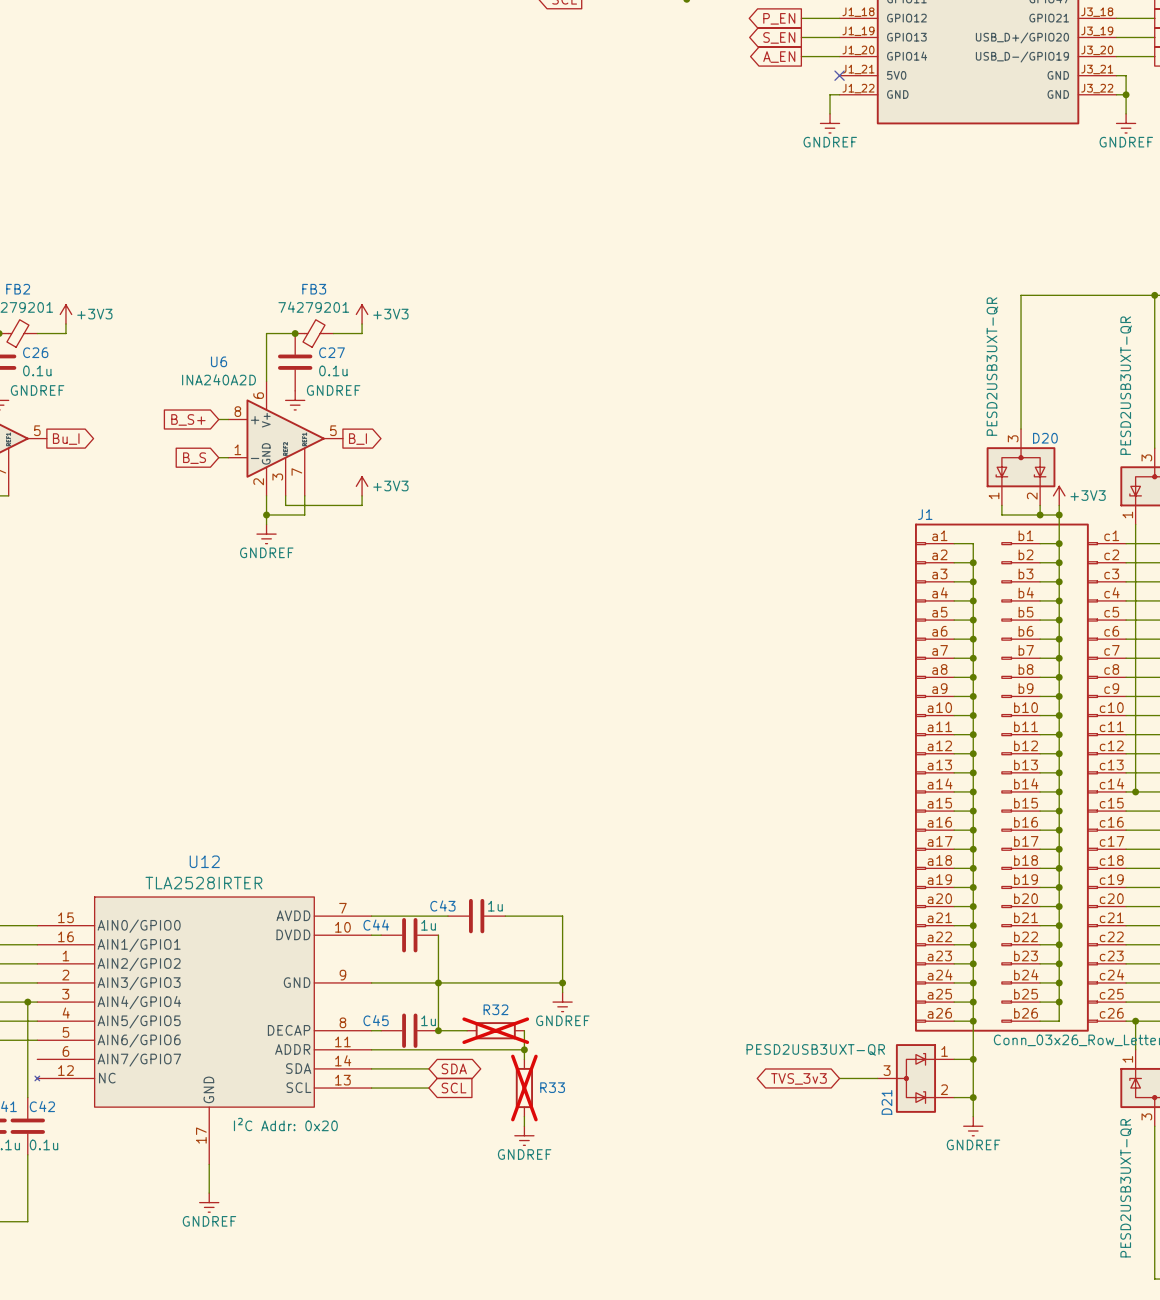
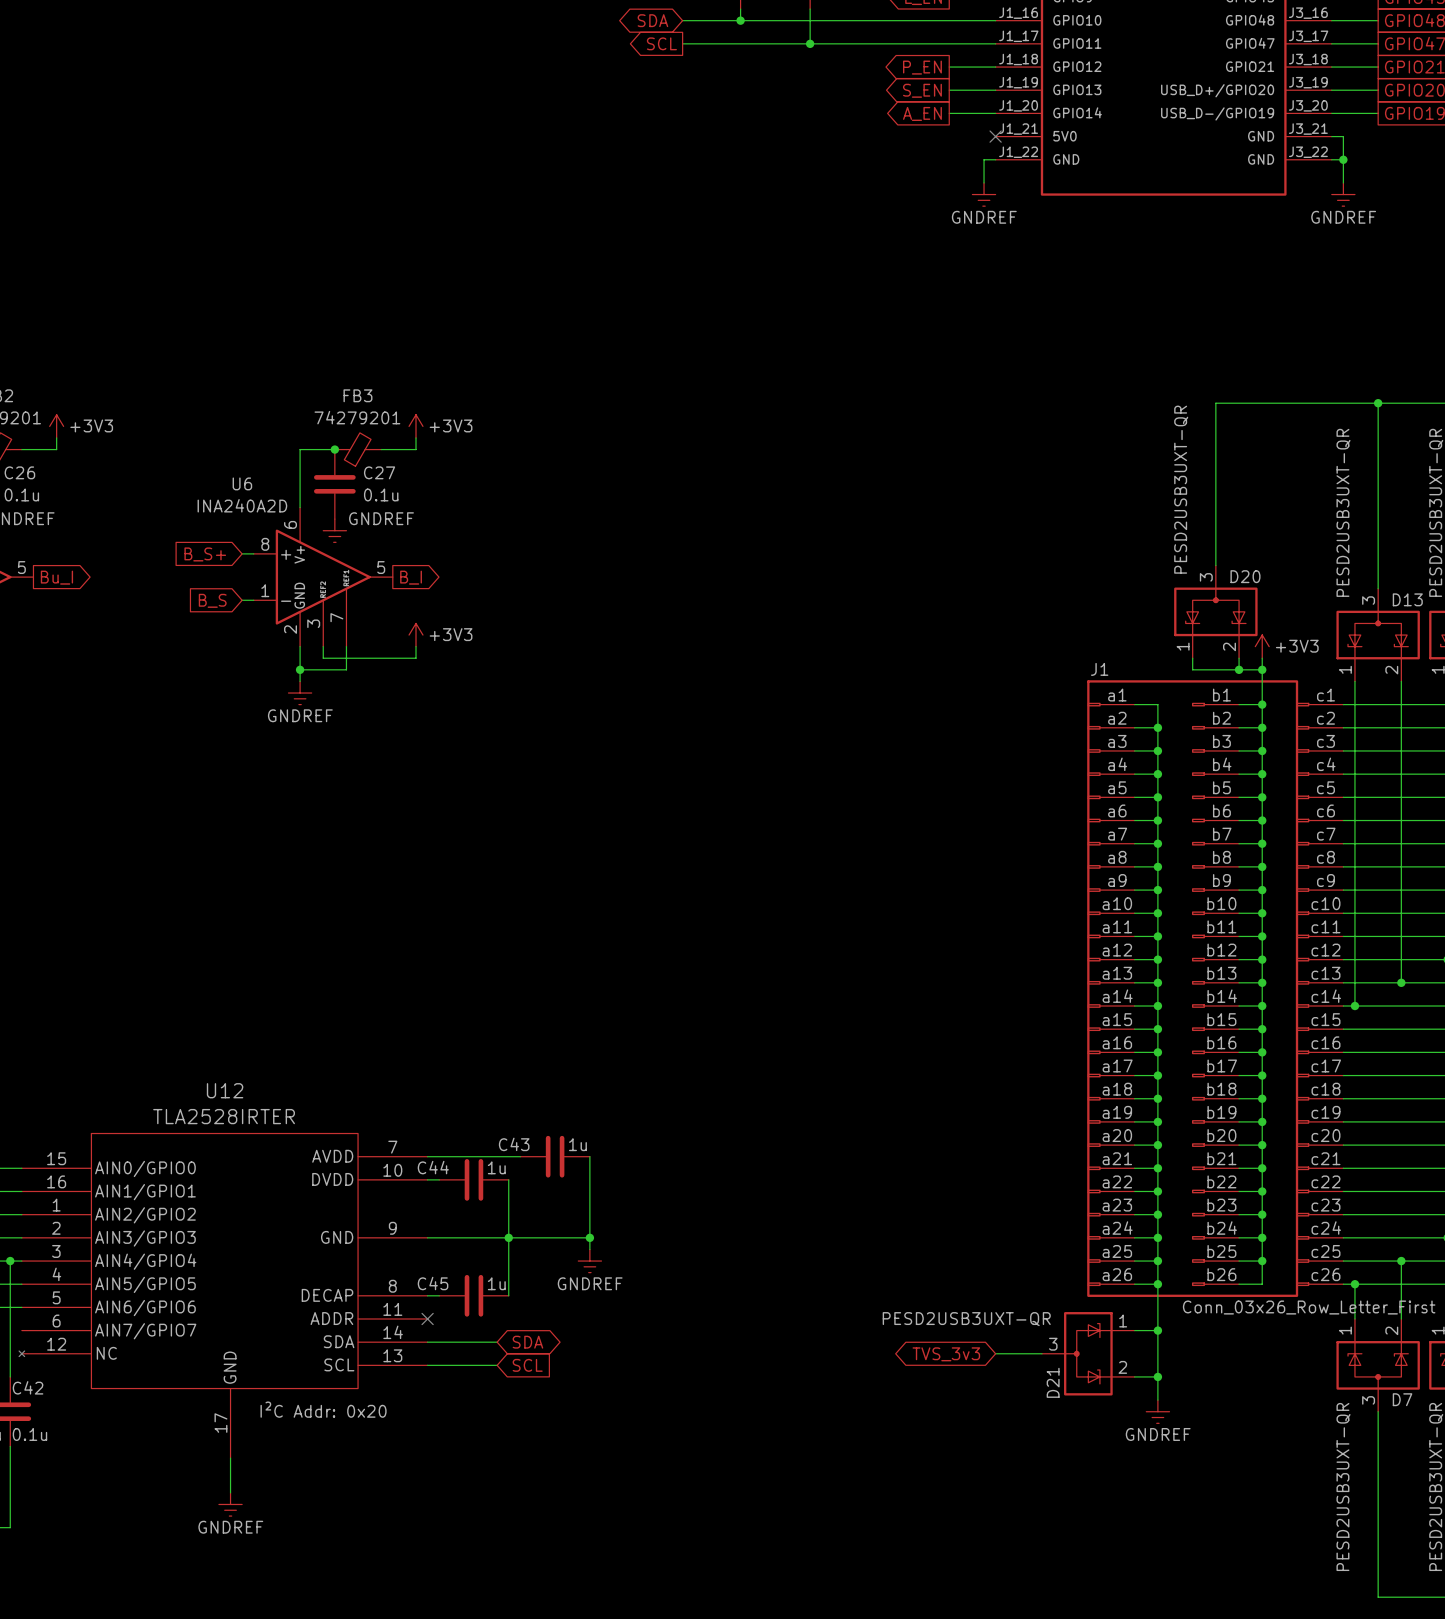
wire: (505, 916) (562, 916) (562, 992) -> (589, 1156) (589, 1249)
wire: (505, 982) (562, 982) -> none
junction: none -> (589, 1237)
junction: (562, 982) -> none
power symbol position: GNDREF (562, 1002) -> GNDREF (589, 1261)
wire: (438, 1030) (467, 1030) -> none
junction: (438, 1030) -> none
R32: (495, 1030) -> none
wire: (524, 1030) (524, 1059) -> none
wire: (371, 1049) (524, 1049) -> none
no-connect mark: none -> (427, 1318)
junction: (524, 1049) -> none
R33: (524, 1088) -> none
wire: (524, 1116) (524, 1126) -> none
power symbol: GNDREF (524, 1135) -> none

